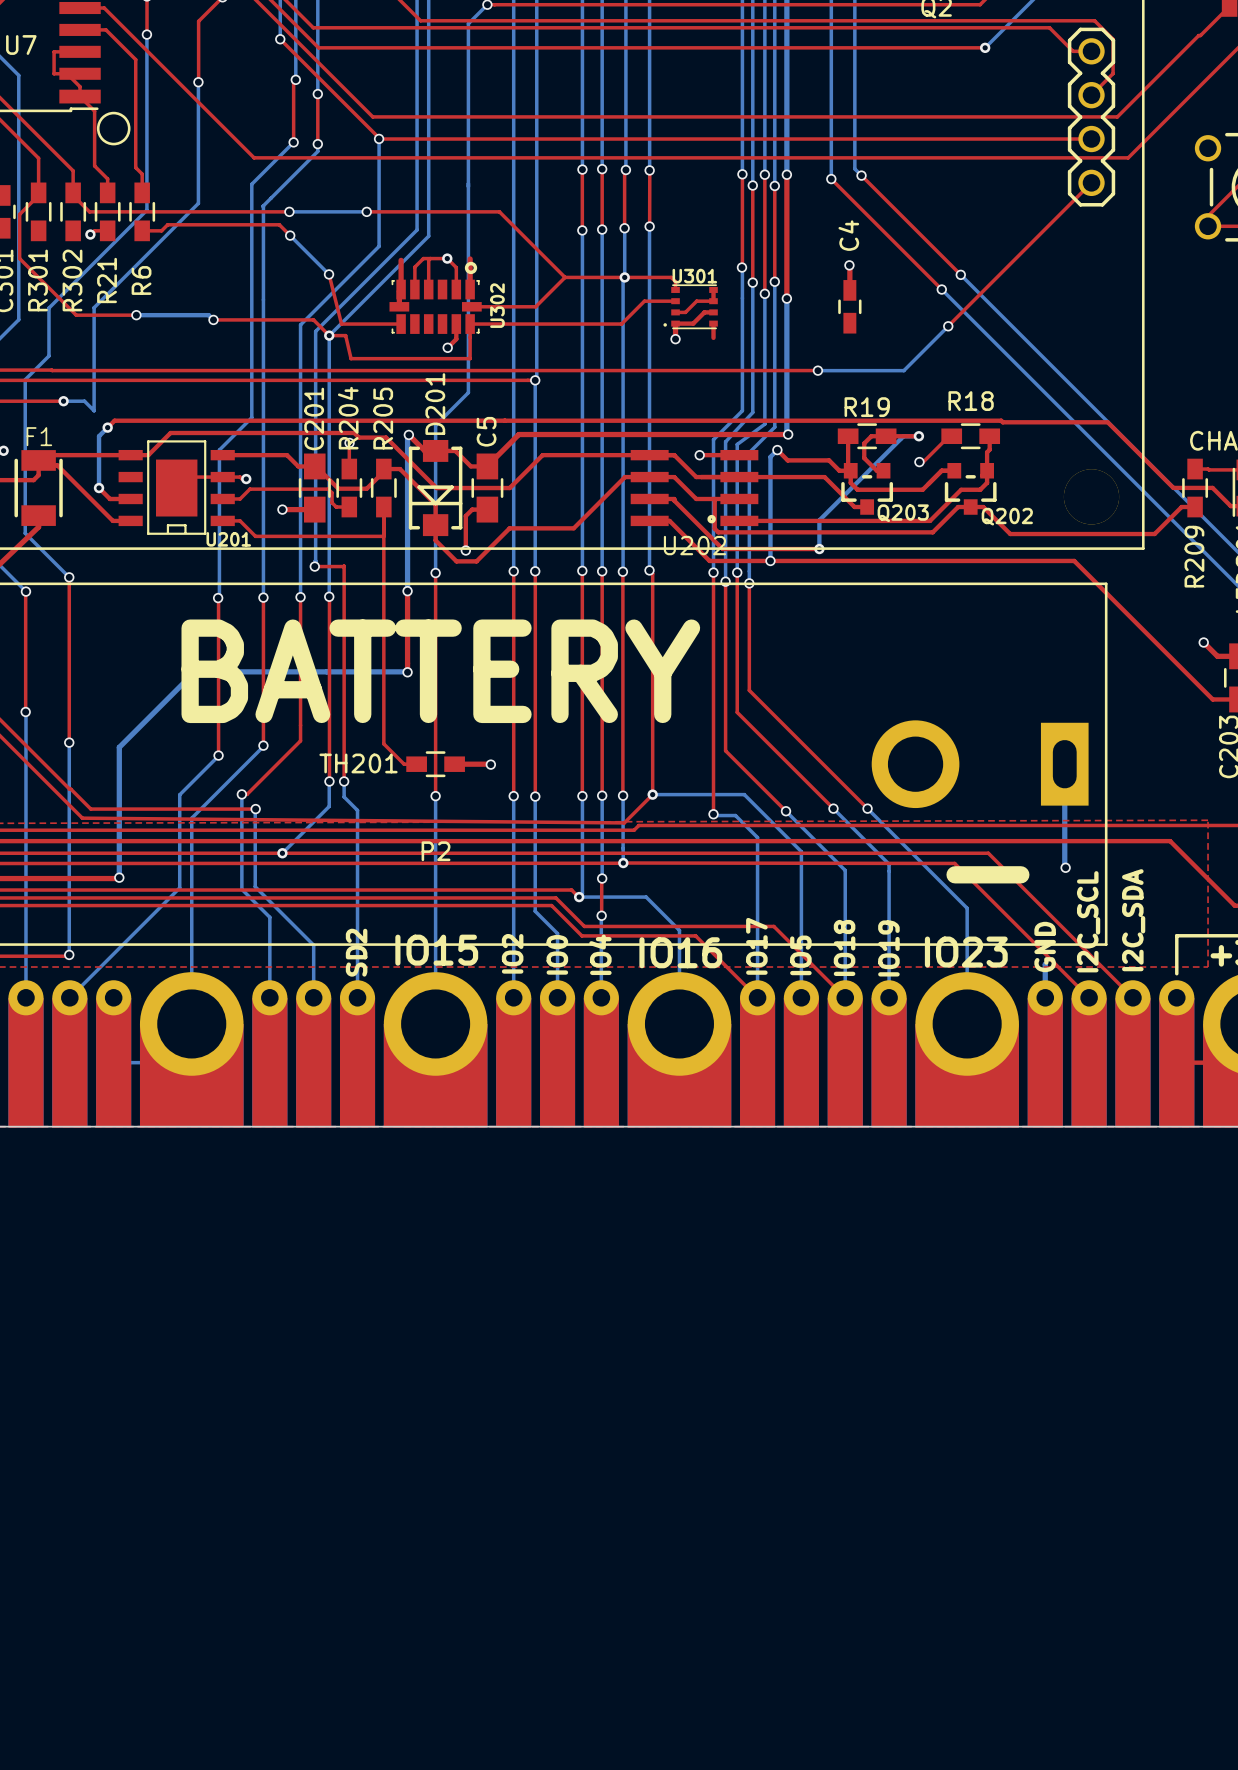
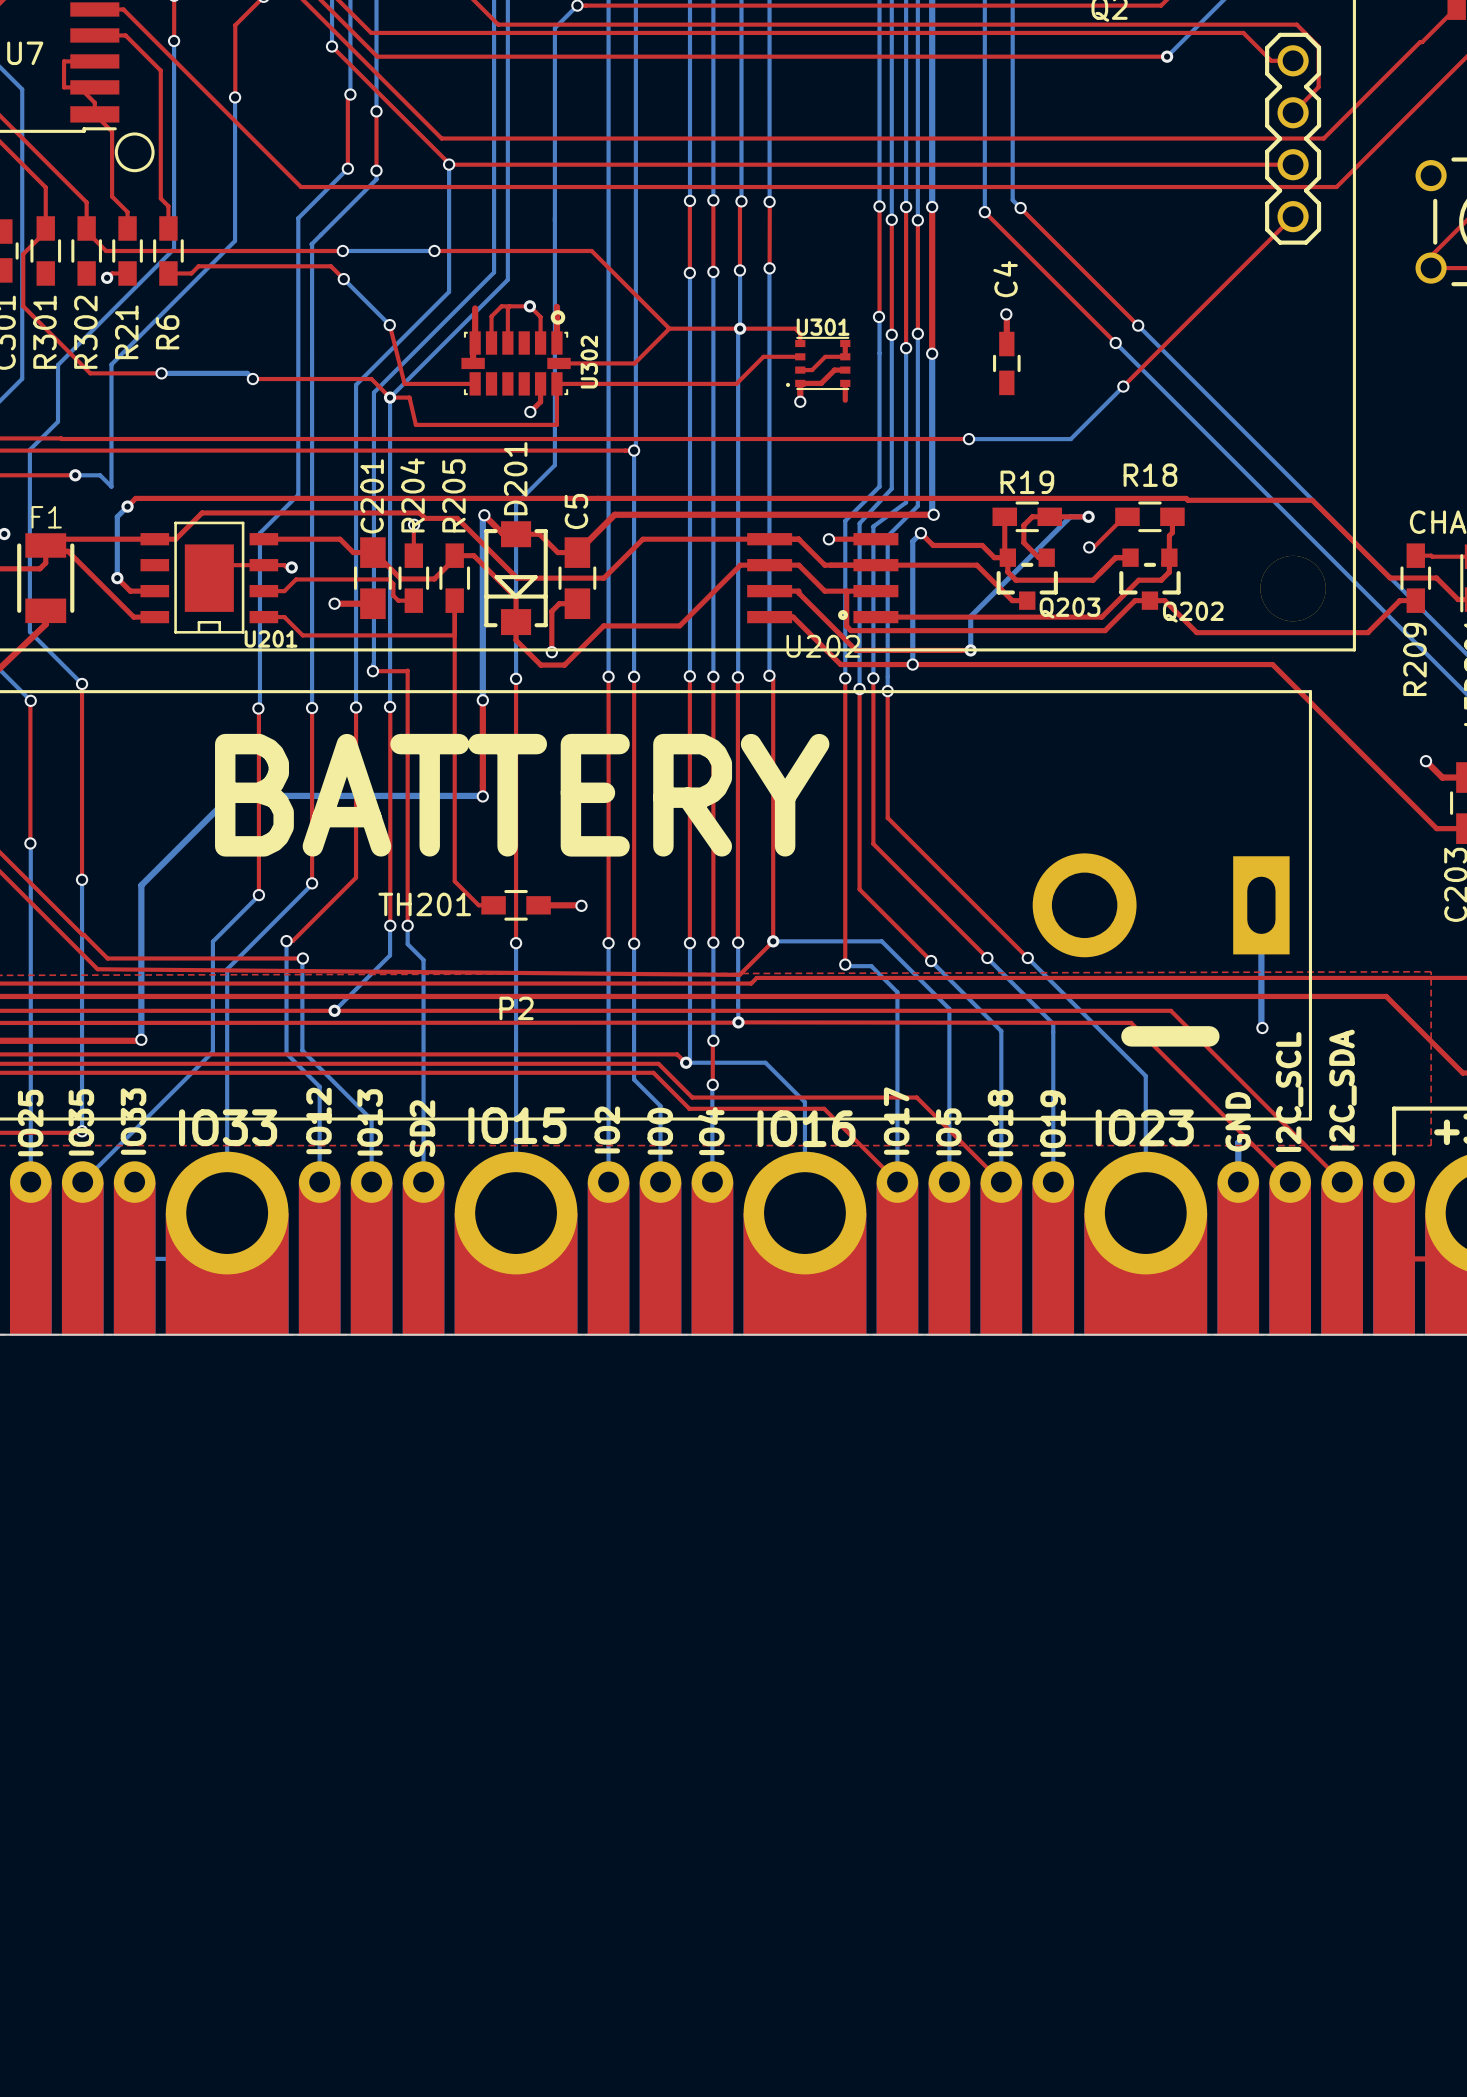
text: none -> IO33 (133, 1121)
text: none -> IO12 (318, 1120)
text: none -> IO25 (30, 1123)
text: none -> IO35 (81, 1122)
text: none -> IO13 (370, 1122)
text: none -> IO33 (228, 1127)

